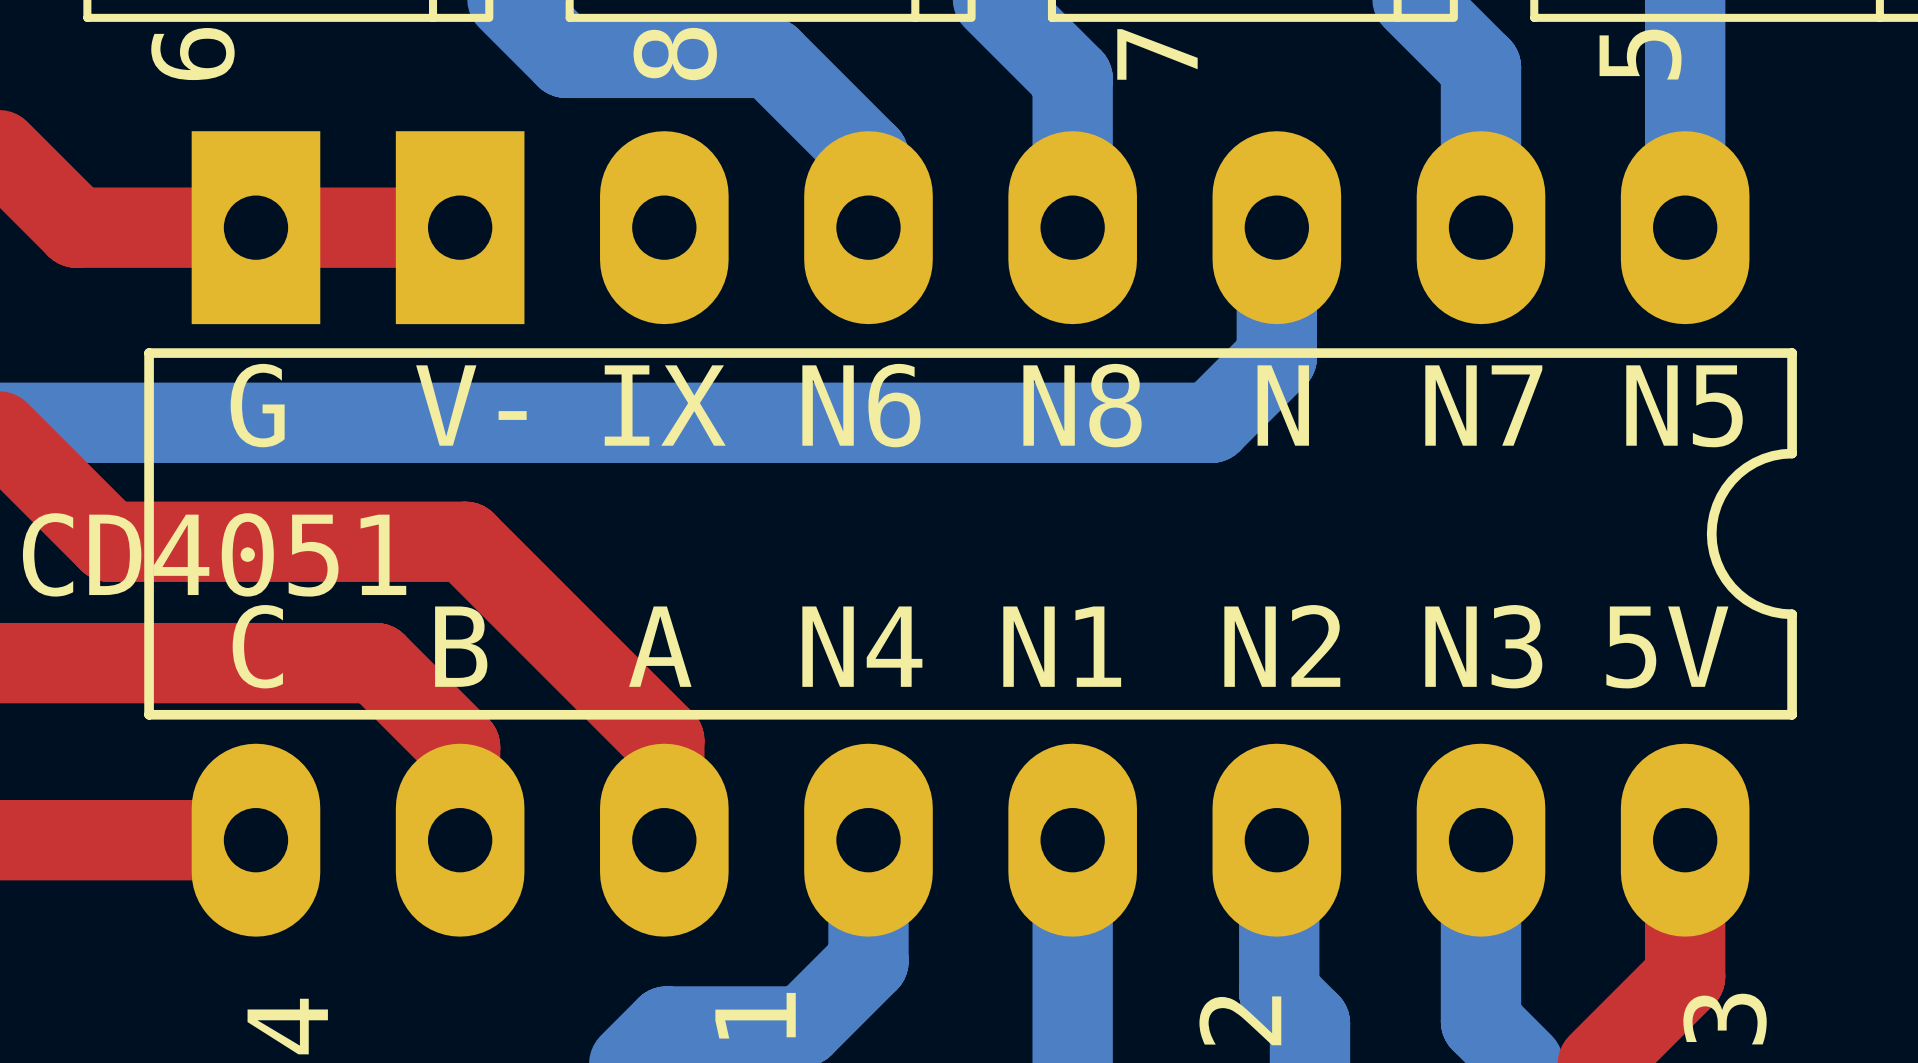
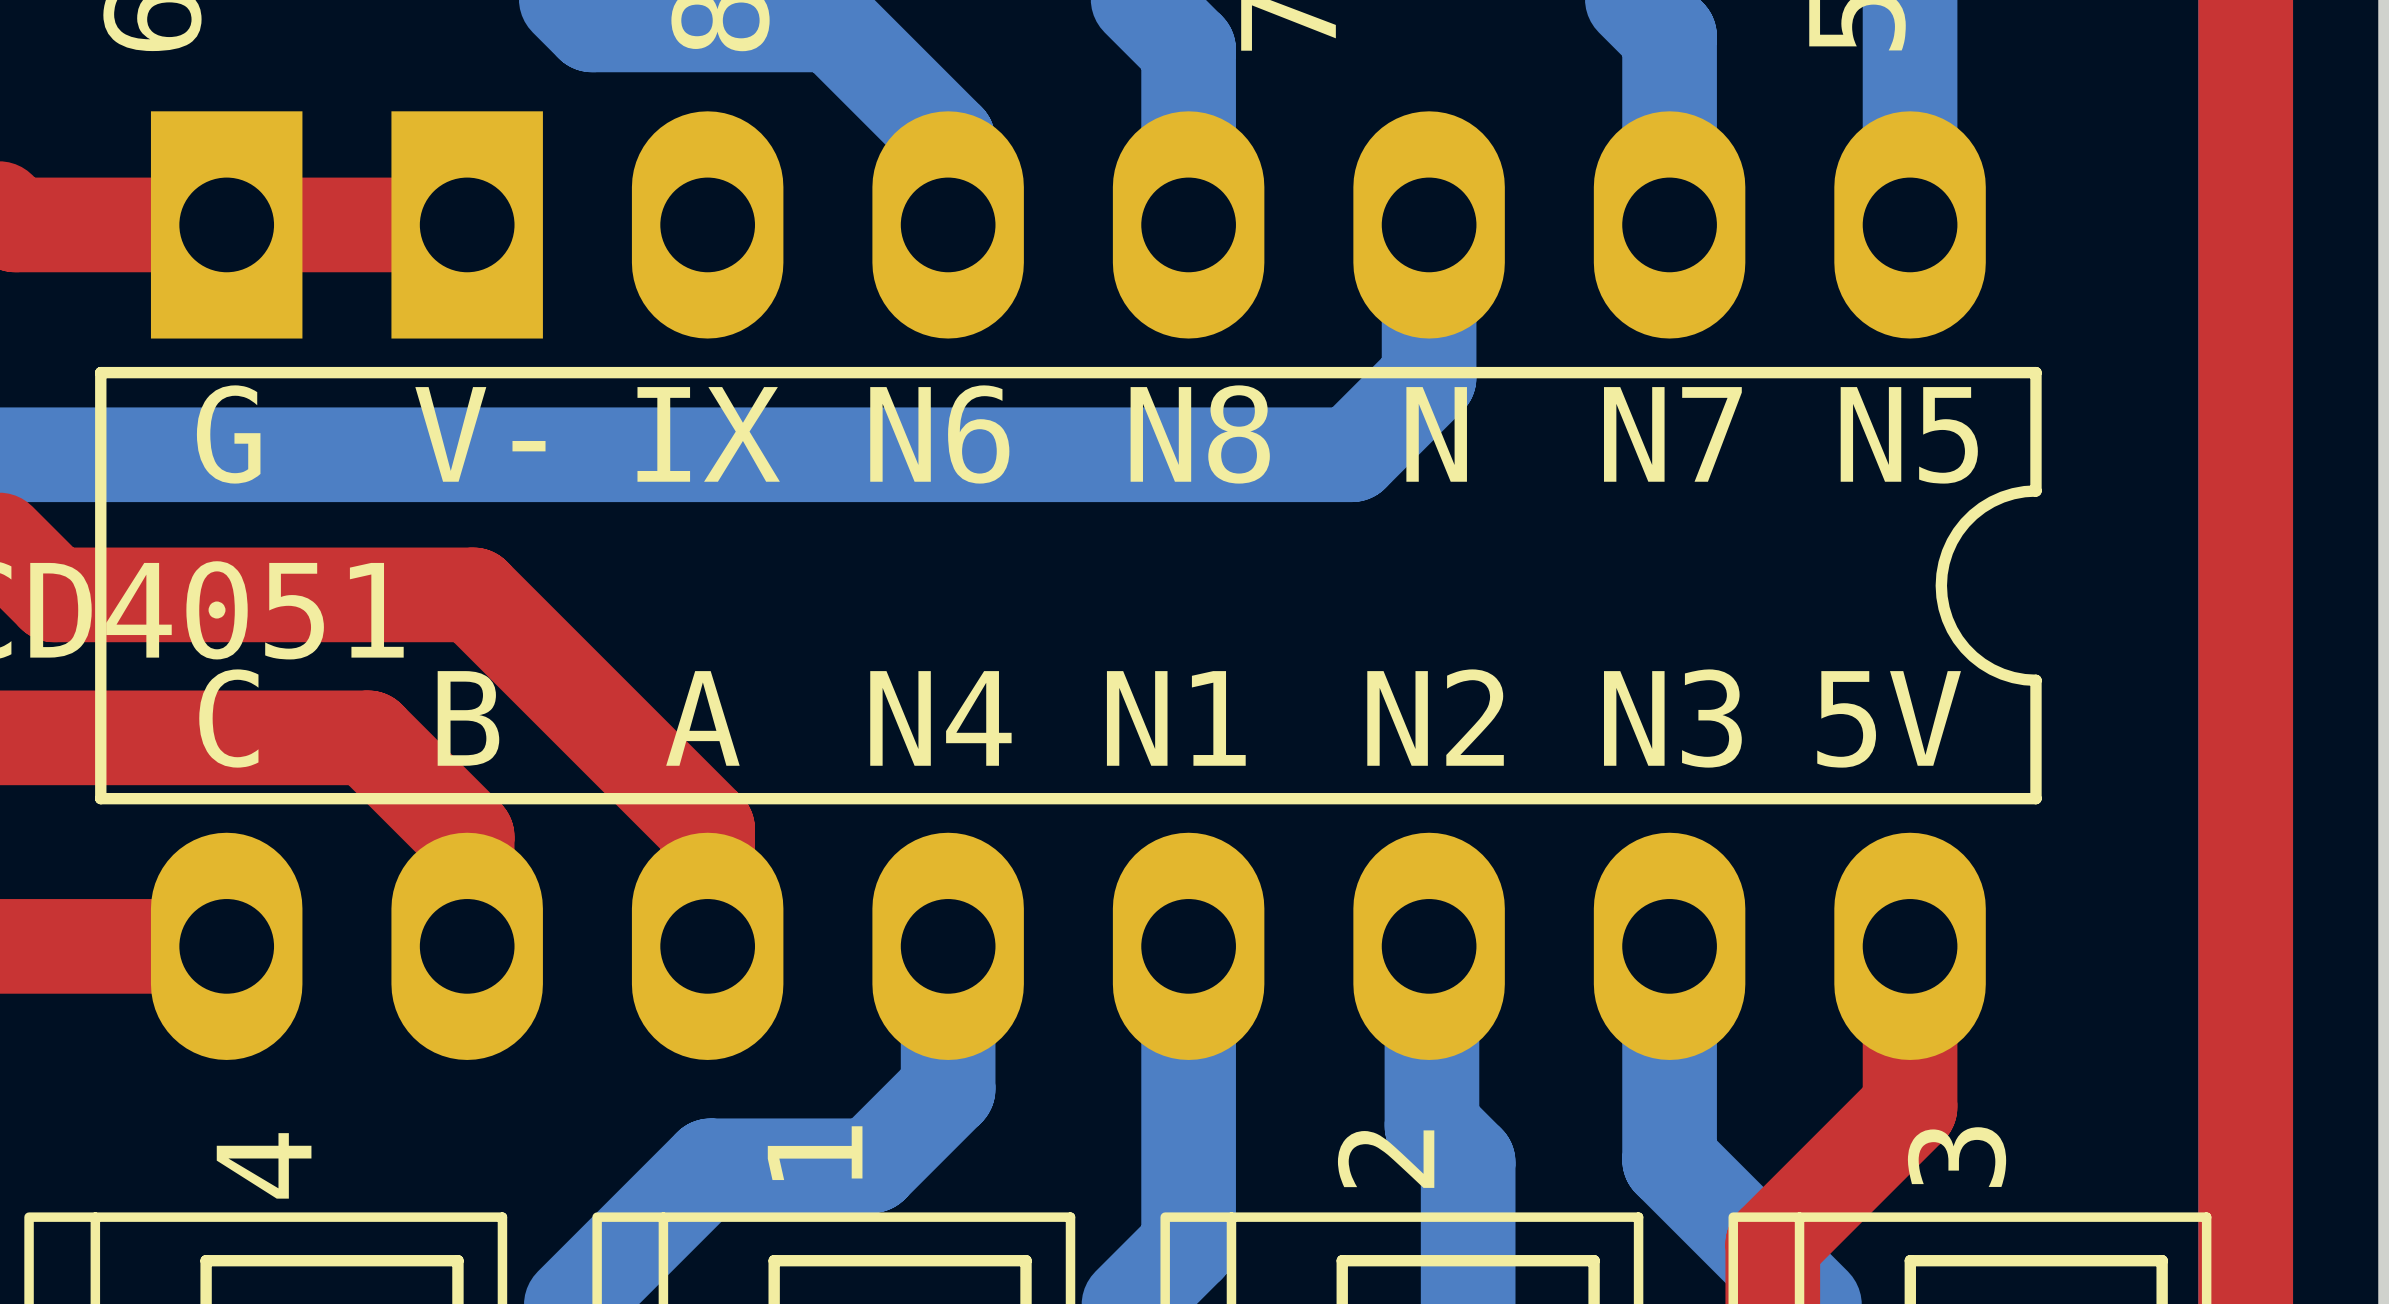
CD4051 footprint: [144, 131, 1797, 937] -> [95, 111, 2042, 1060]

